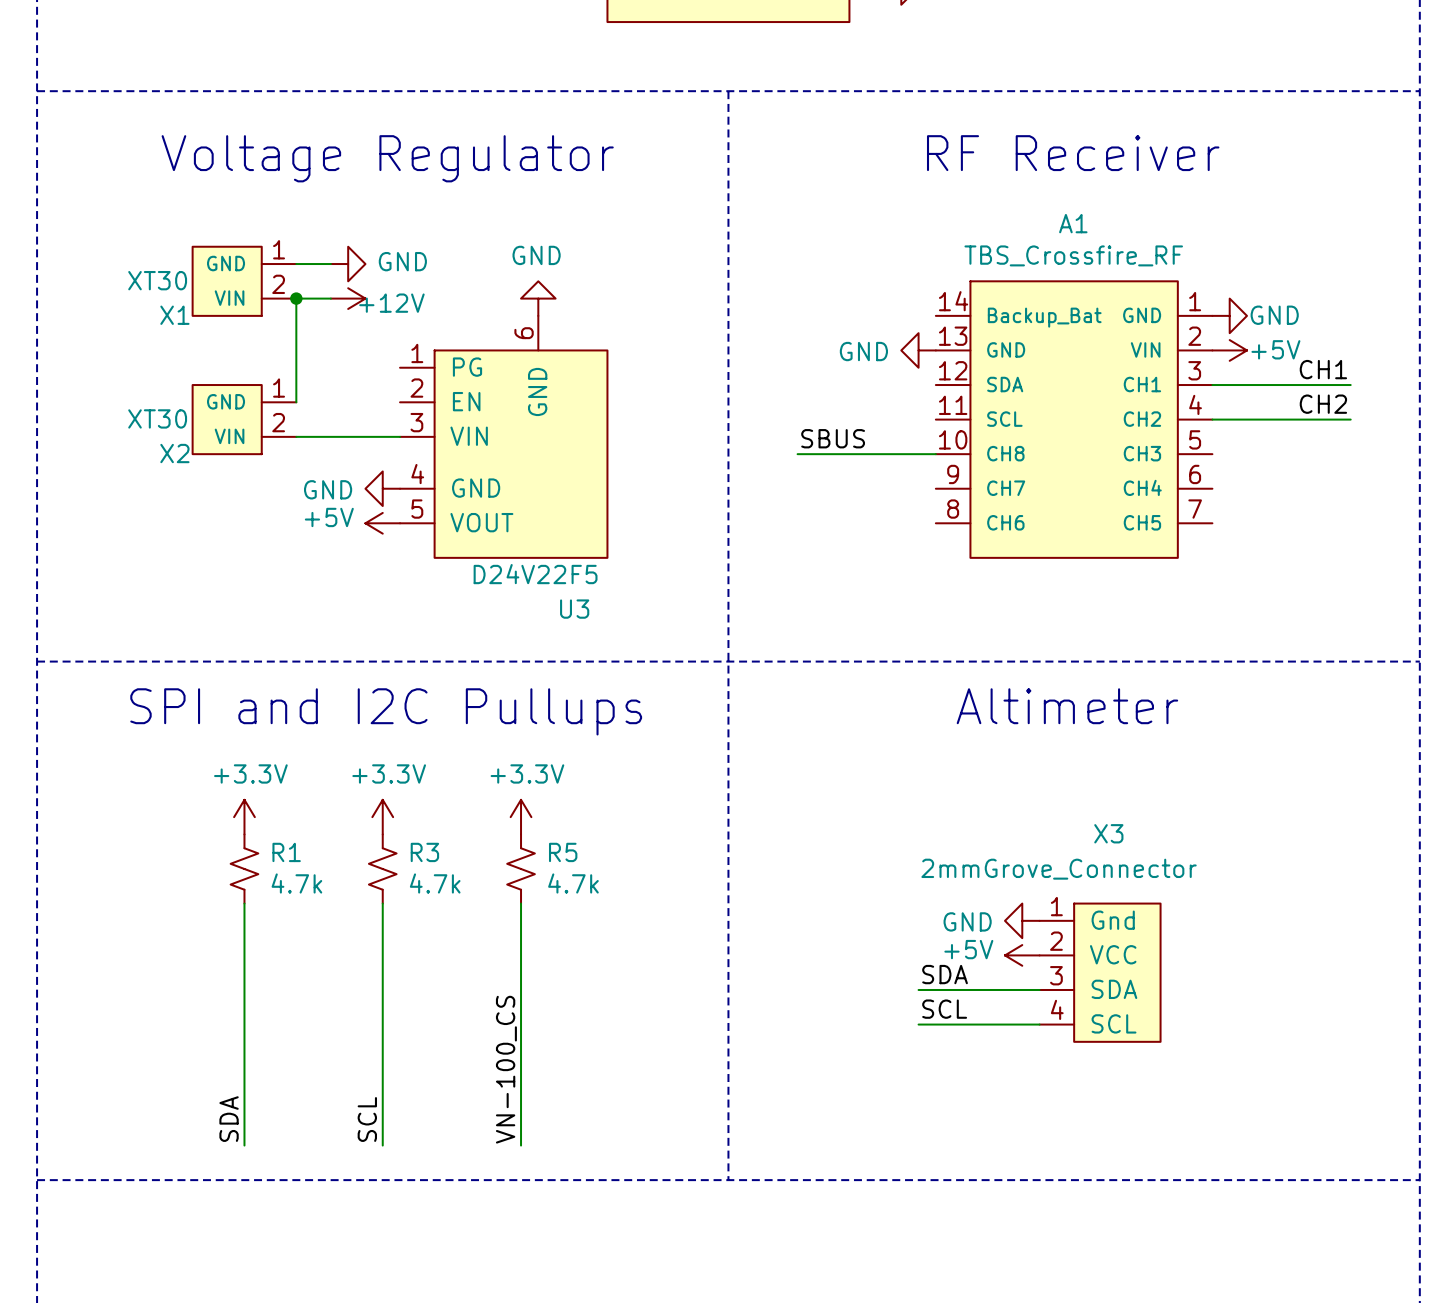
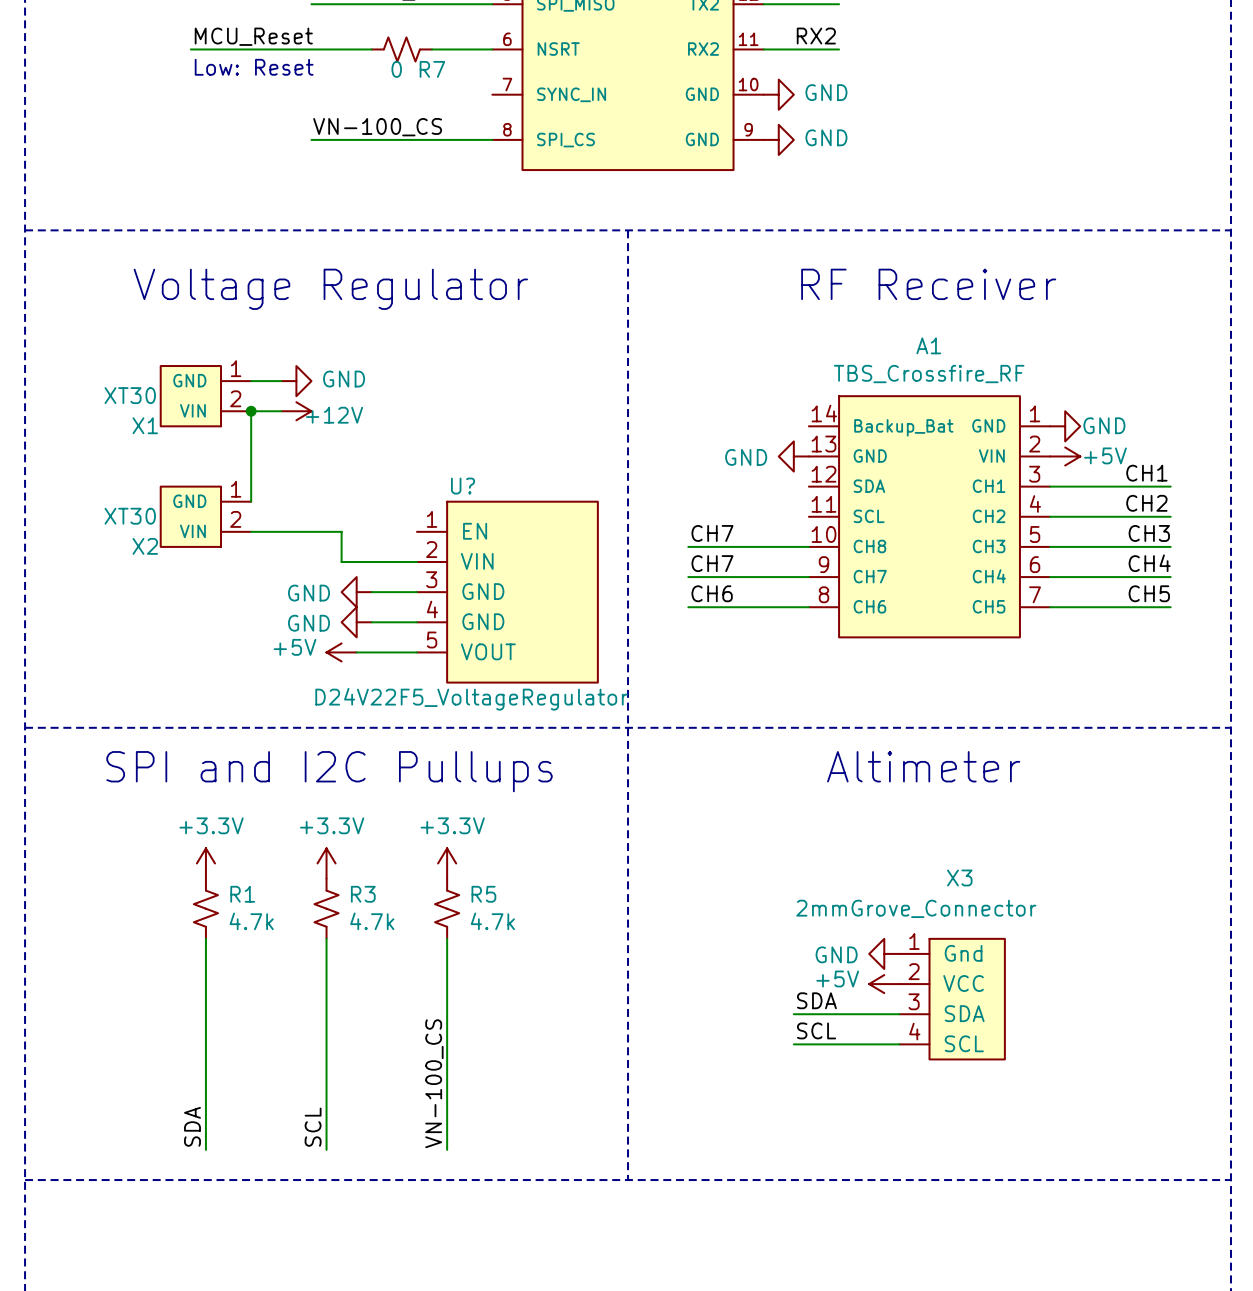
power symbol: GND (538, 298) -> none
wire: none -> (341, 531) (341, 561) (416, 561)
U3: D24V22F5 (503, 436) -> none
label: SBUS (833, 438) -> CH7 (712, 533)
label: none -> CH3 (1149, 533)
wire: none -> (1050, 546) (1170, 546)
label: none -> CH4 (1149, 563)
label: none -> CH7 (712, 563)
power symbol: GND (382, 488) -> none
wire: none -> (688, 577) (808, 577)
wire: none -> (1050, 577) (1170, 577)
power symbol: none -> GND (356, 592)
U?: none -> D24V22F5_VoltageRegulator (507, 592)
label: none -> CH6 (712, 593)
label: none -> CH5 (1149, 593)
power symbol position: +5V (382, 523) -> +5V (341, 652)
wire: none -> (688, 607) (808, 607)
wire: none -> (1050, 607) (1170, 607)
power symbol: none -> GND (356, 622)
wire: none -> (356, 652) (416, 652)

